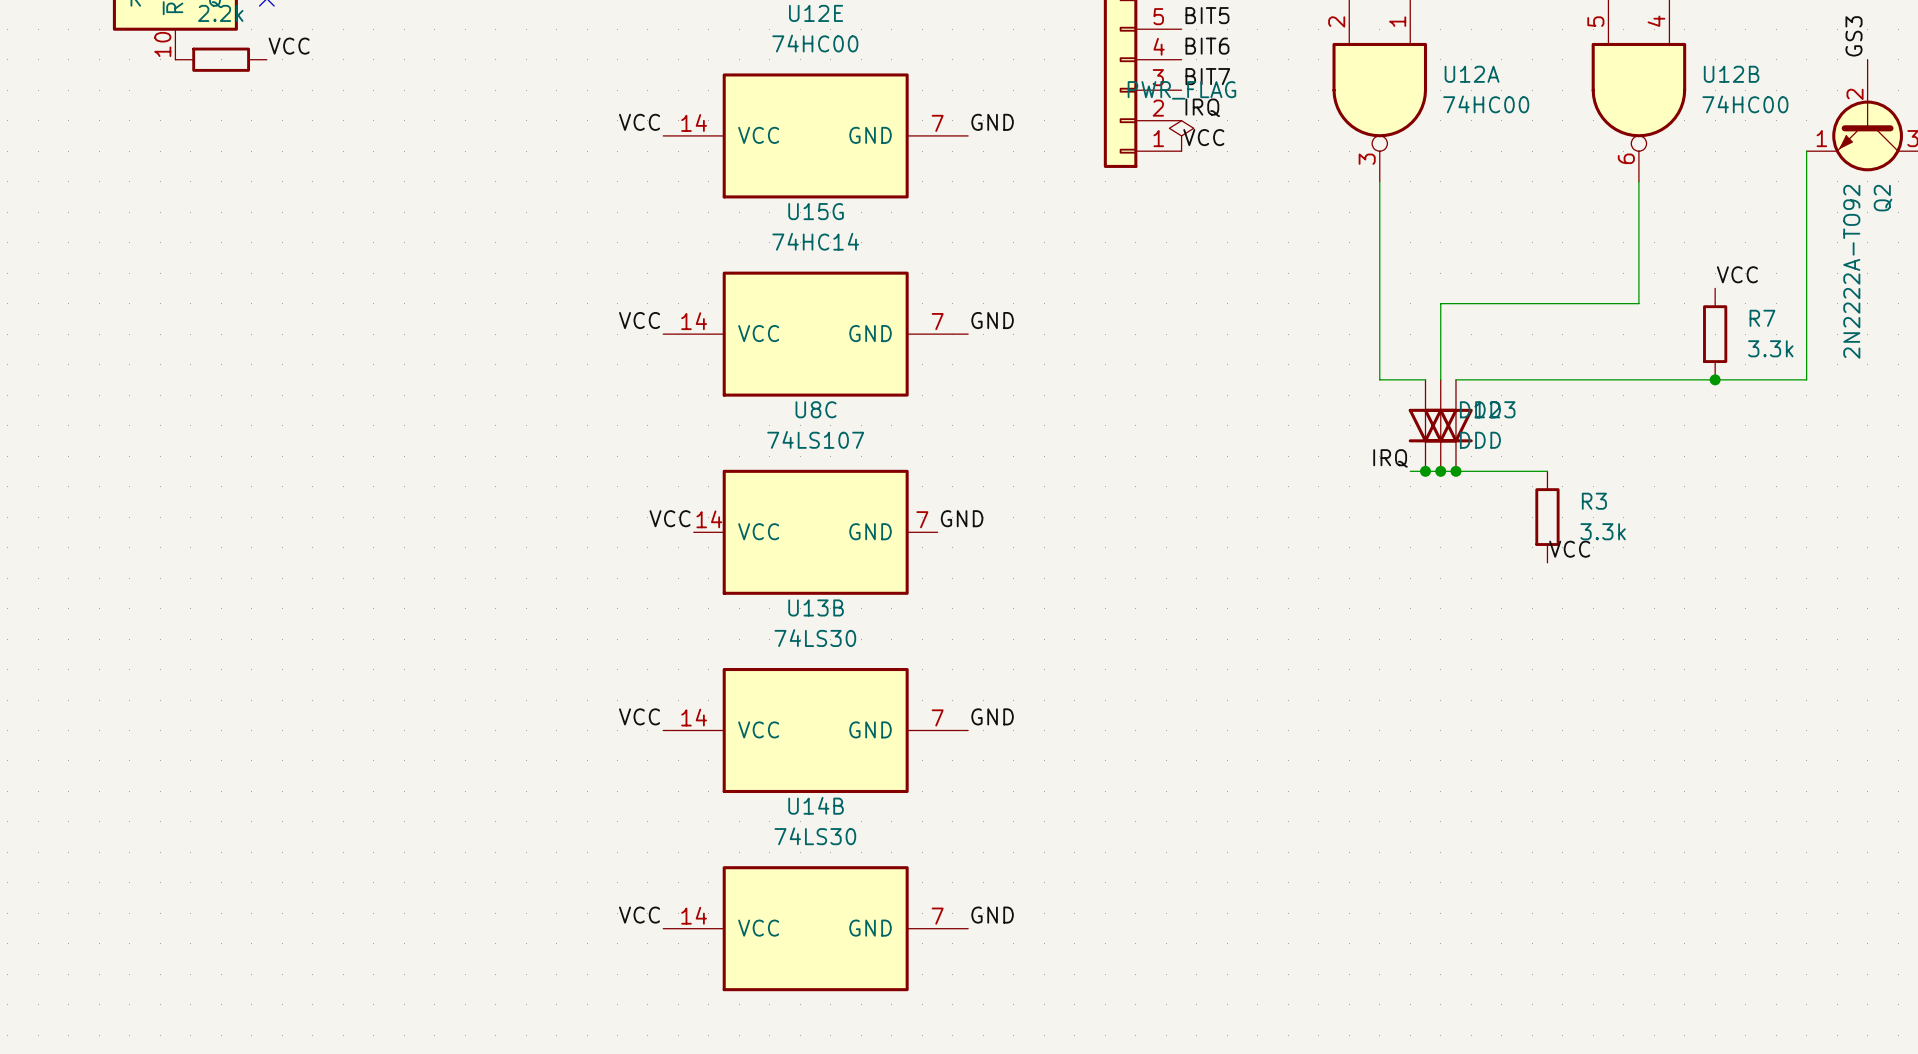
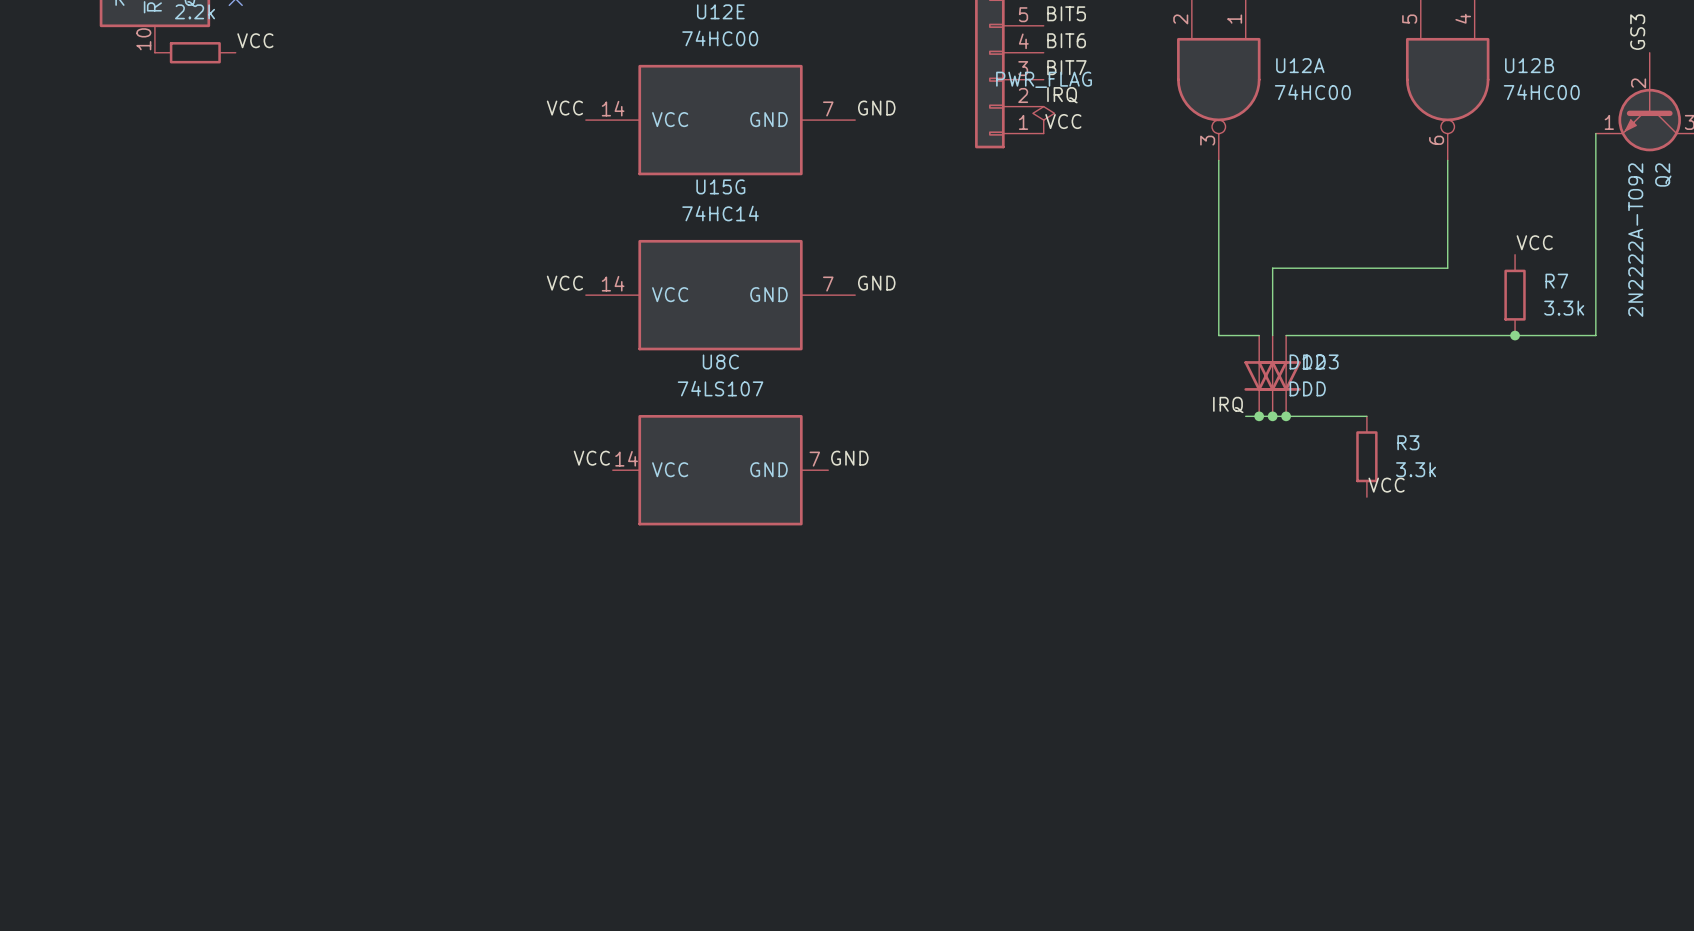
label: VCC (639, 716) -> none
label: GND (992, 716) -> none
U13B: 74LS30 (815, 730) -> none
label: VCC (639, 915) -> none
label: GND (992, 915) -> none
U14B: 74LS30 (815, 928) -> none

